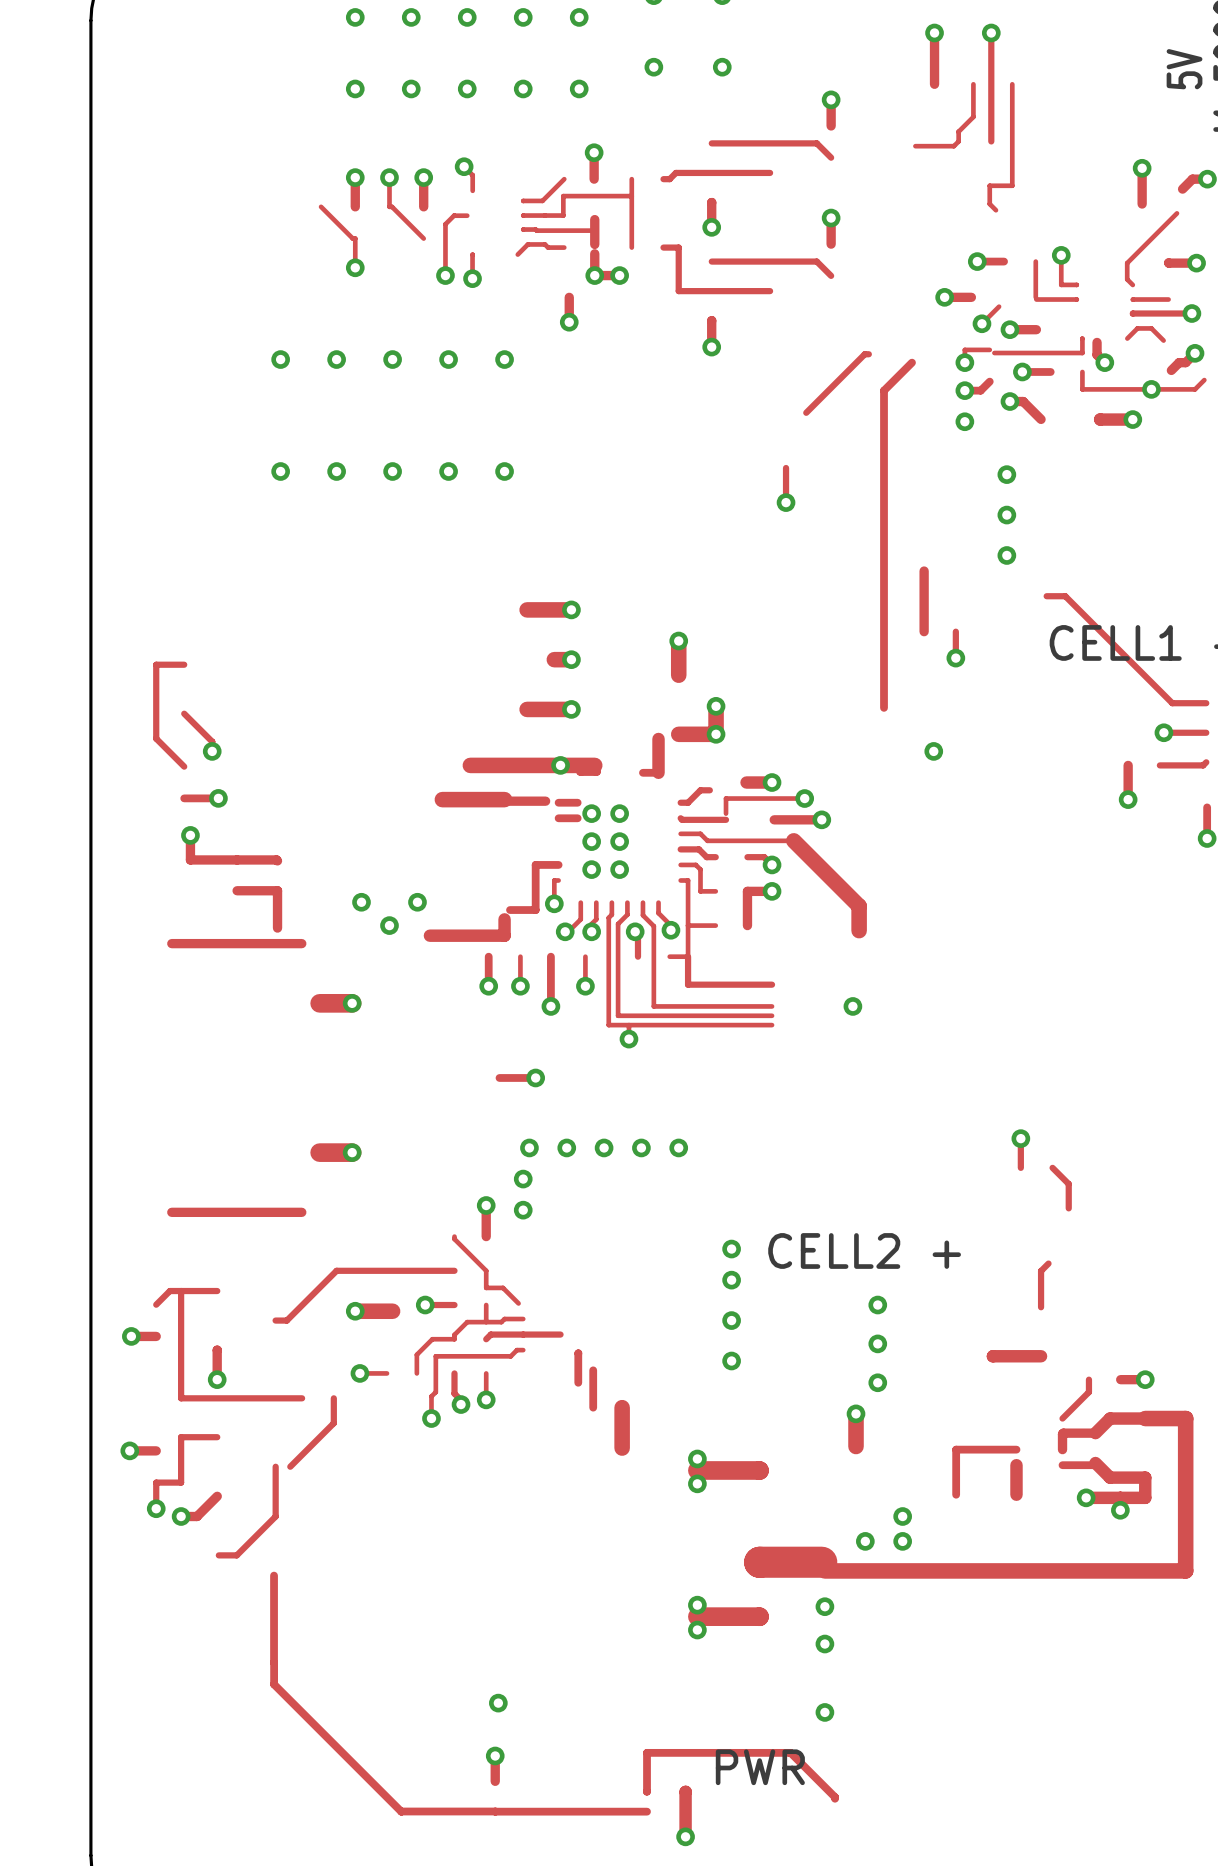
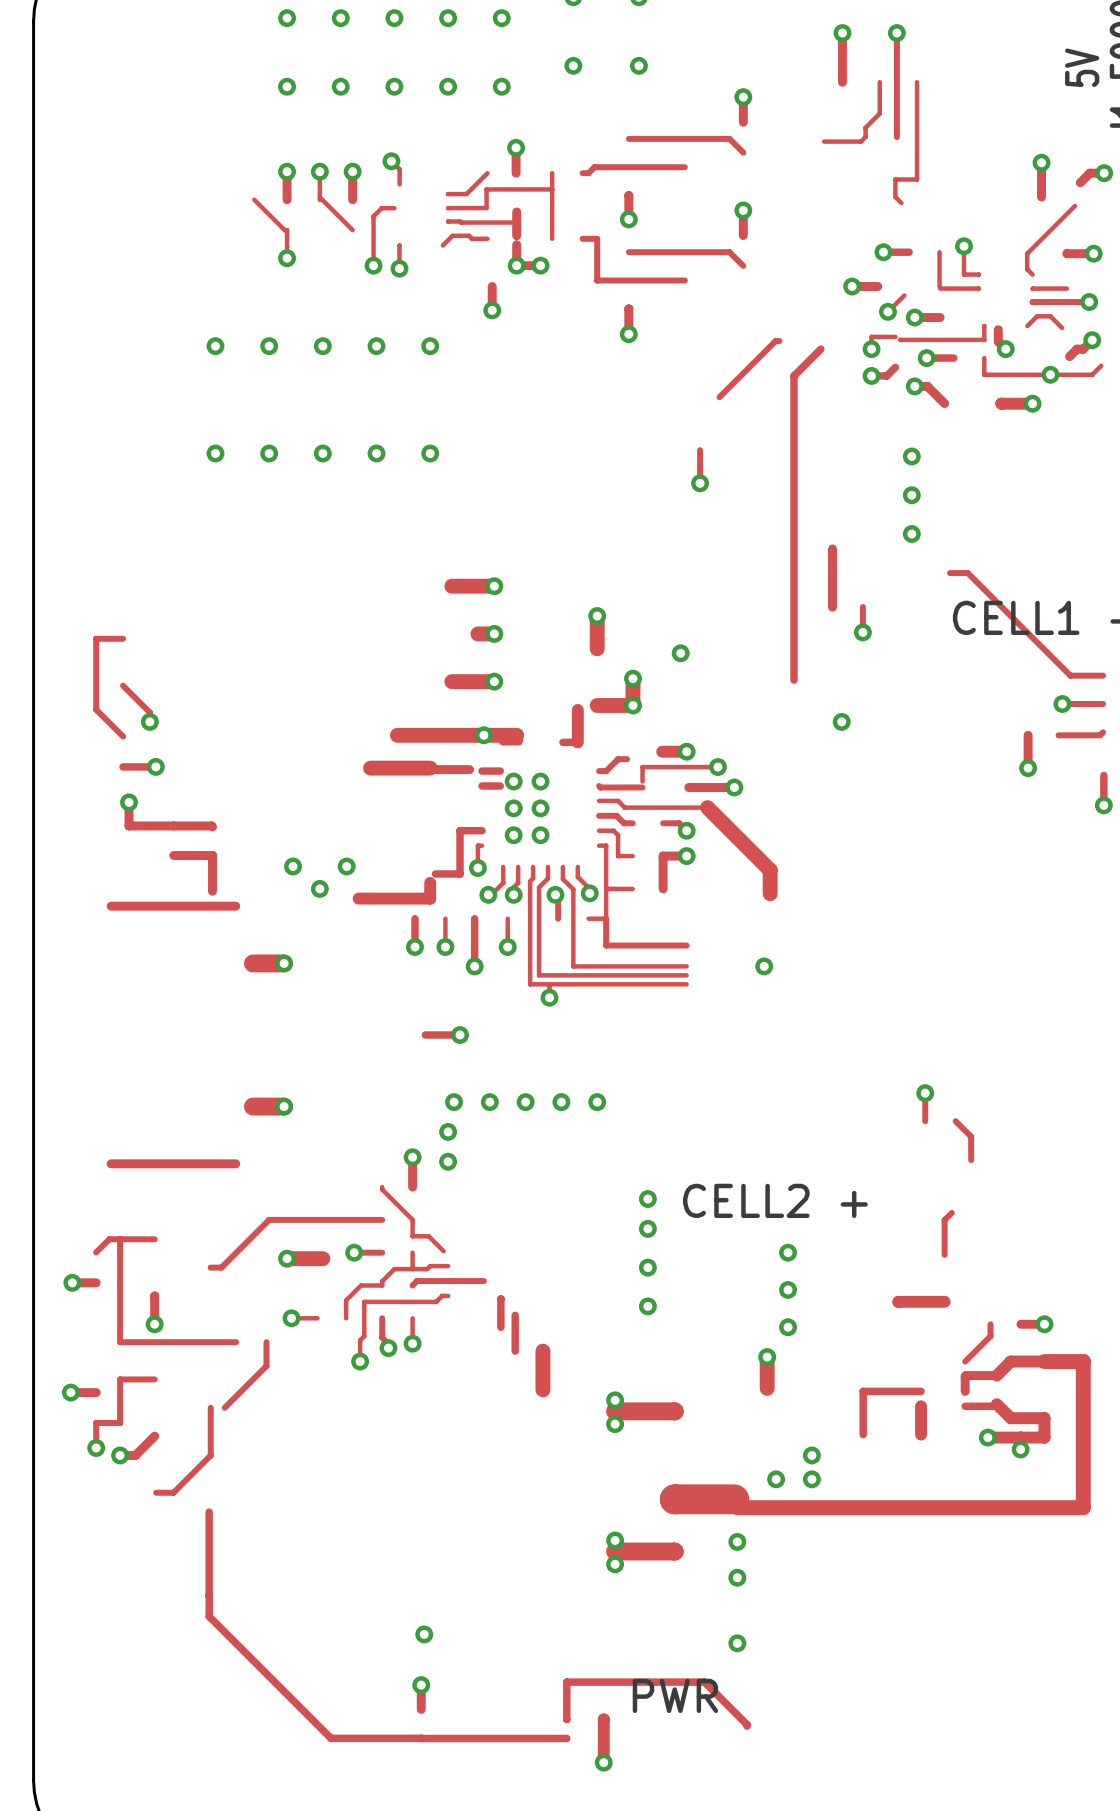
via: (964, 421) -> none
via: none -> (680, 653)

